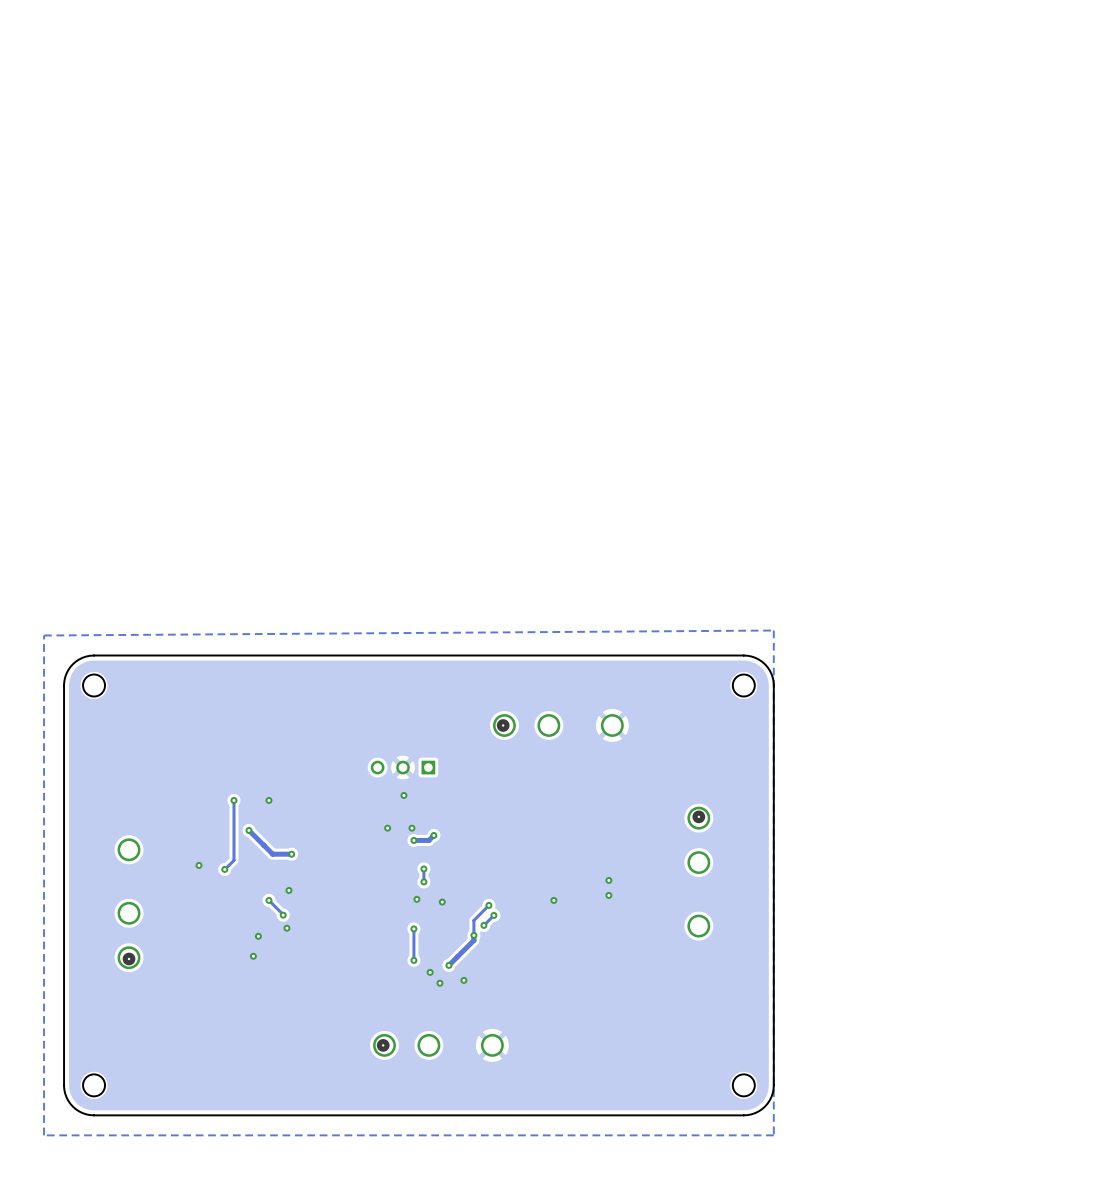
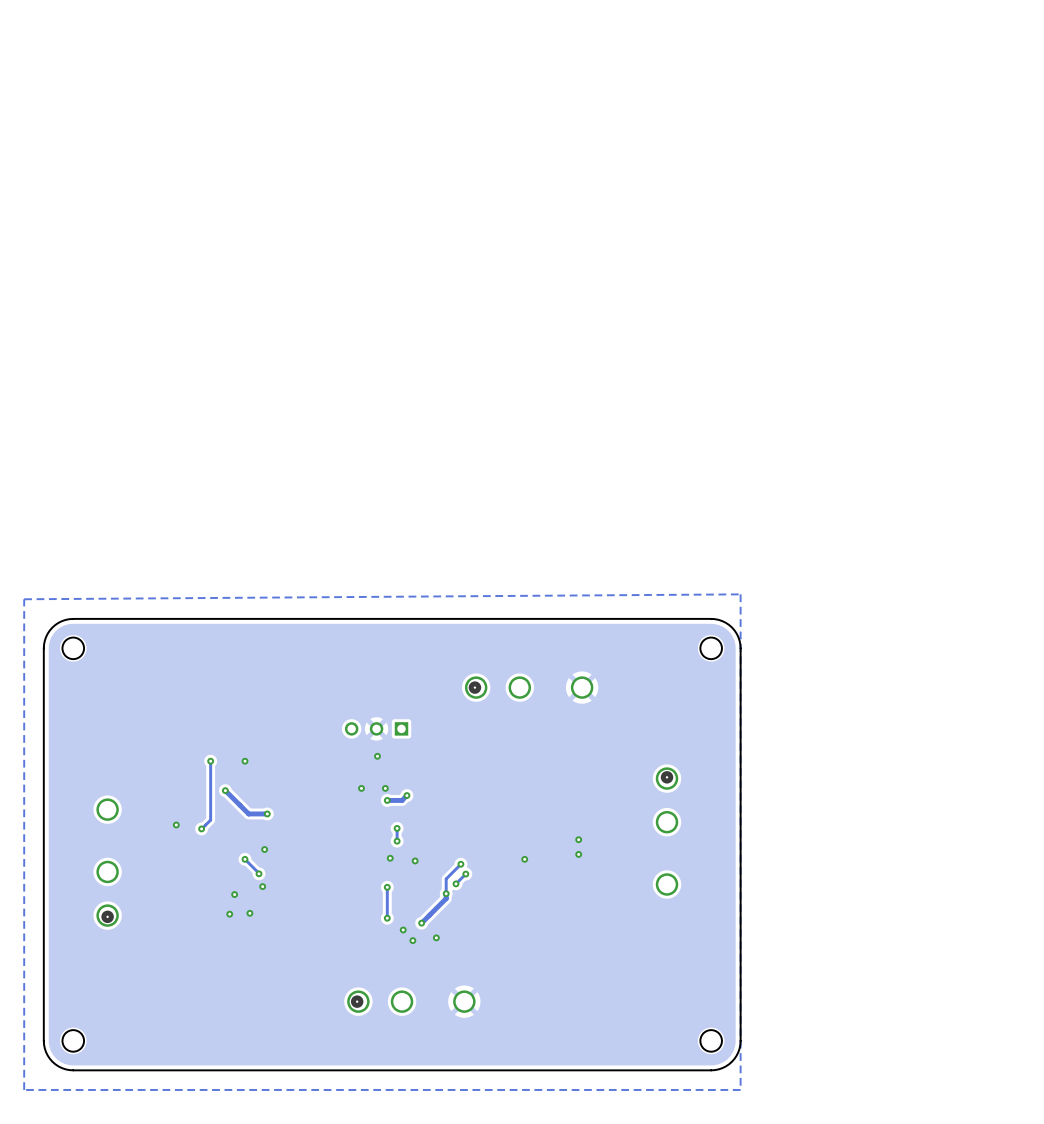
via: none -> (249, 913)

